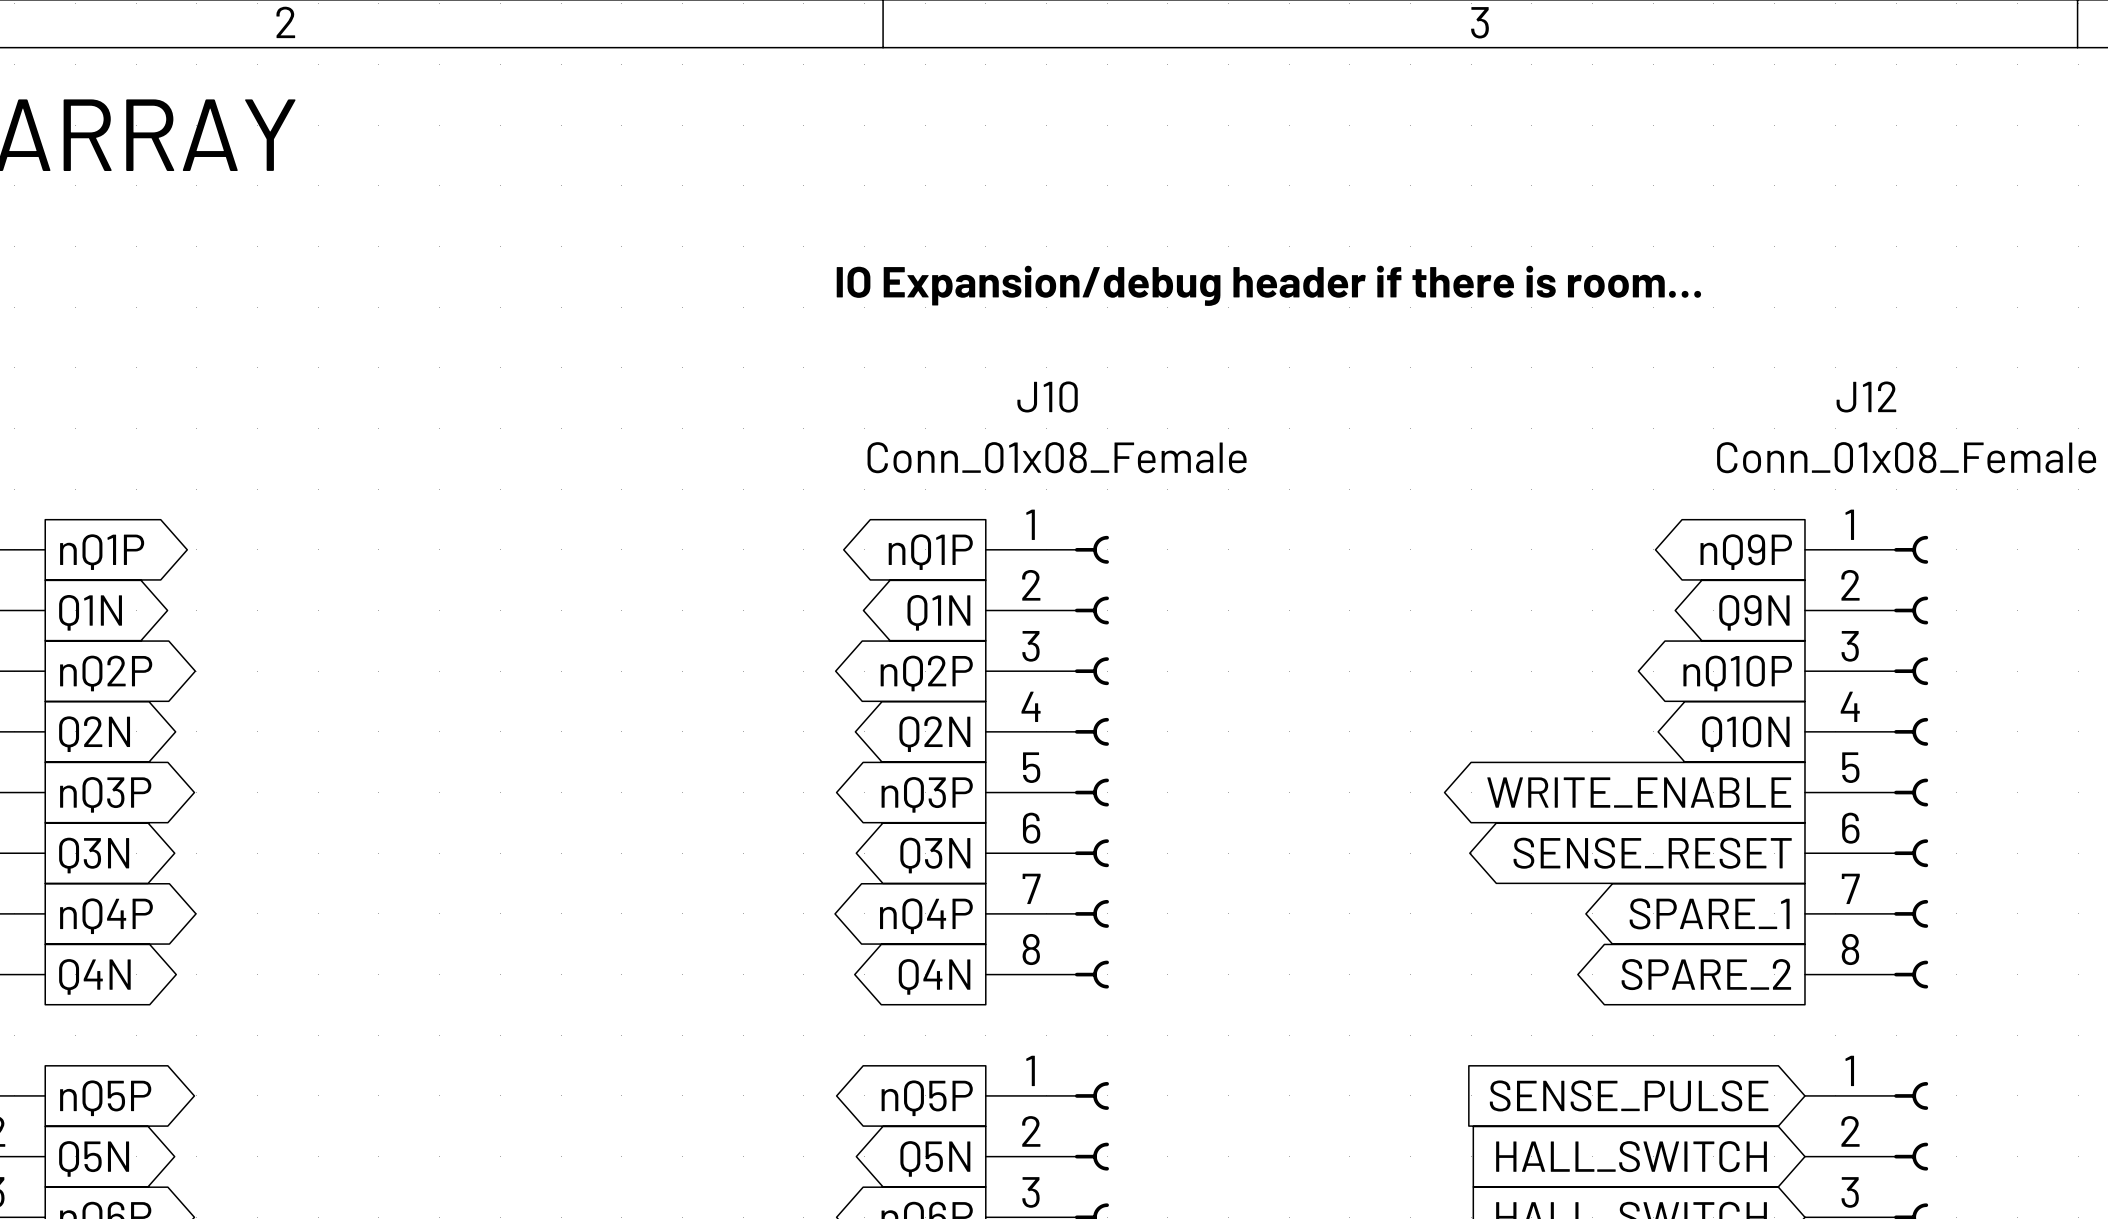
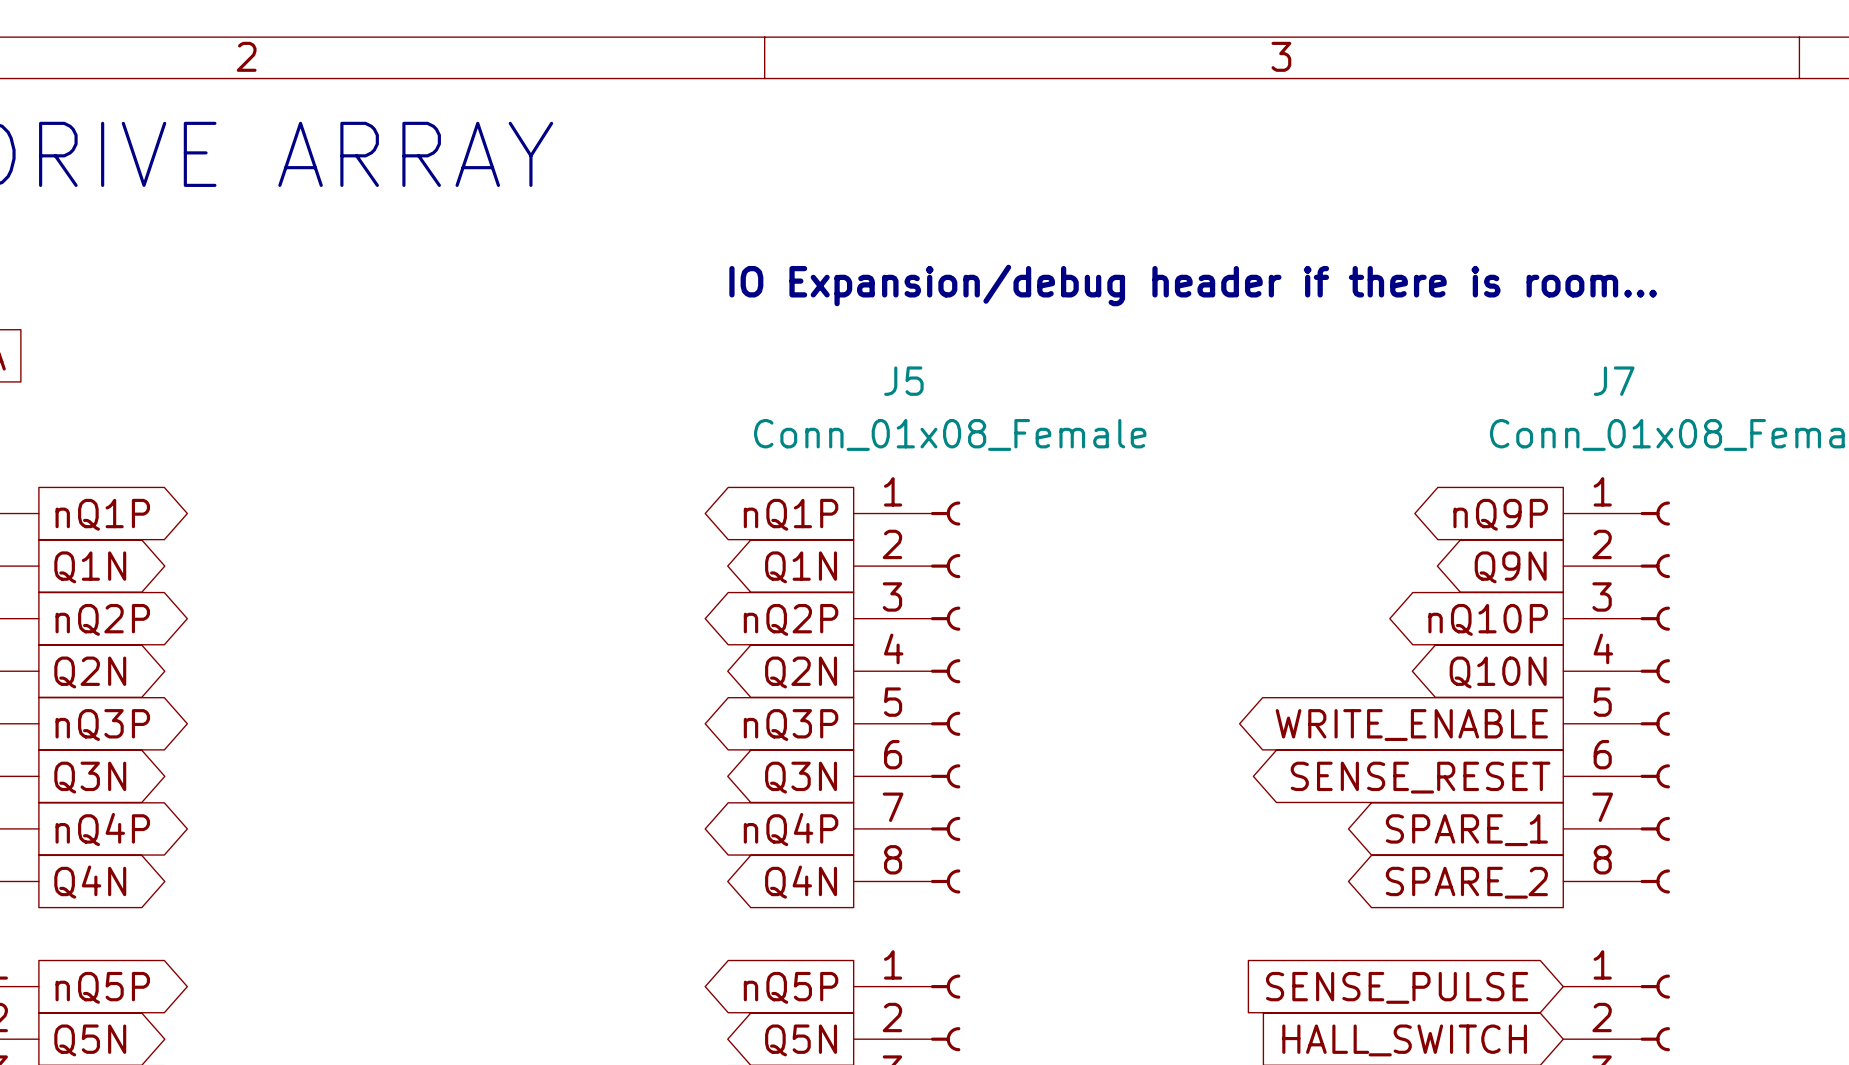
J12 name: J12 (1866, 396) -> J7 (1614, 381)
J10 name: J10 (1047, 397) -> J5 (903, 381)

